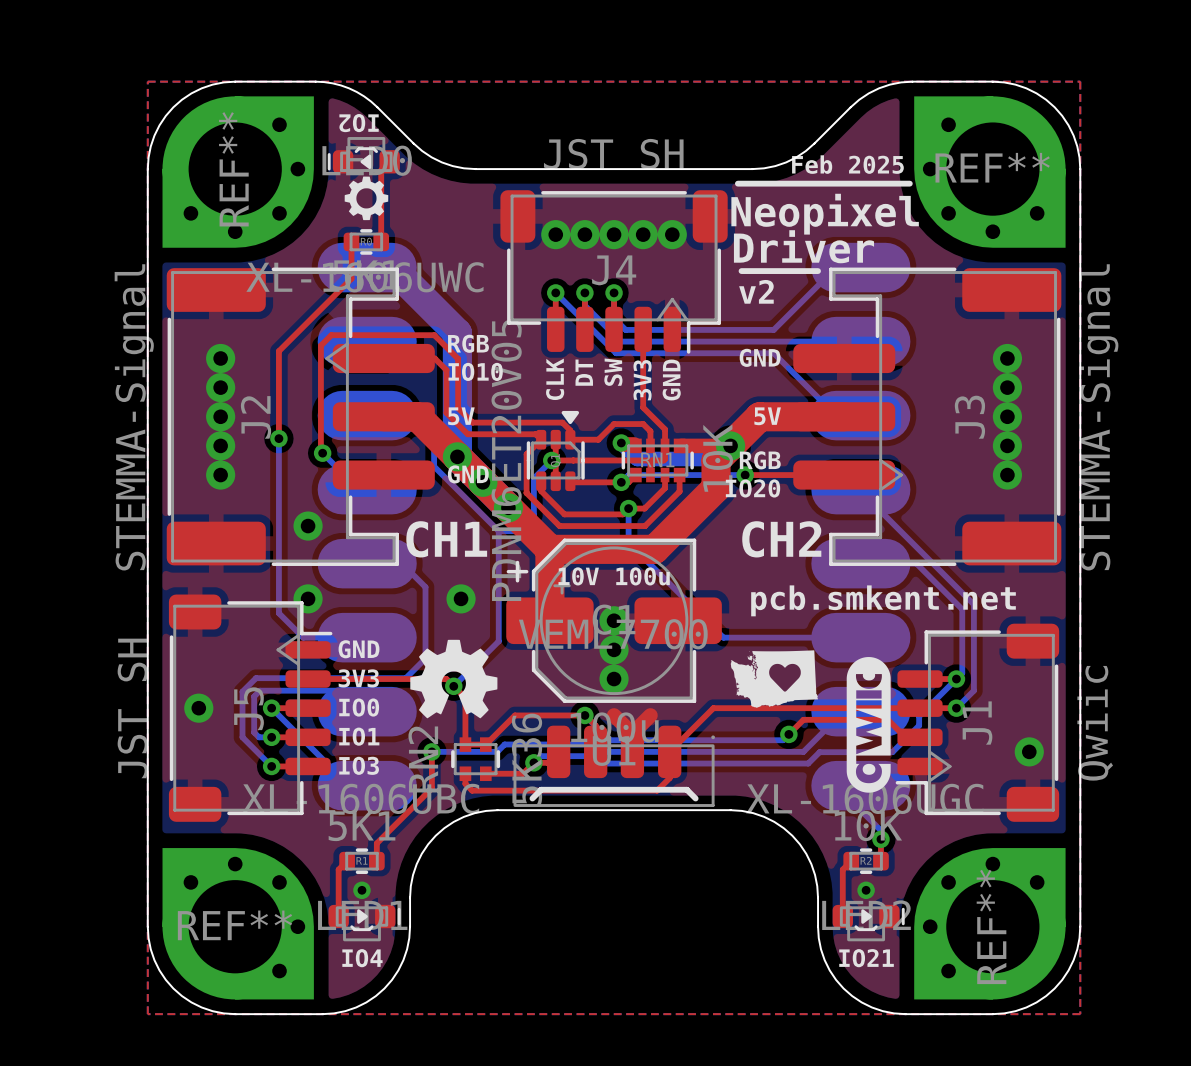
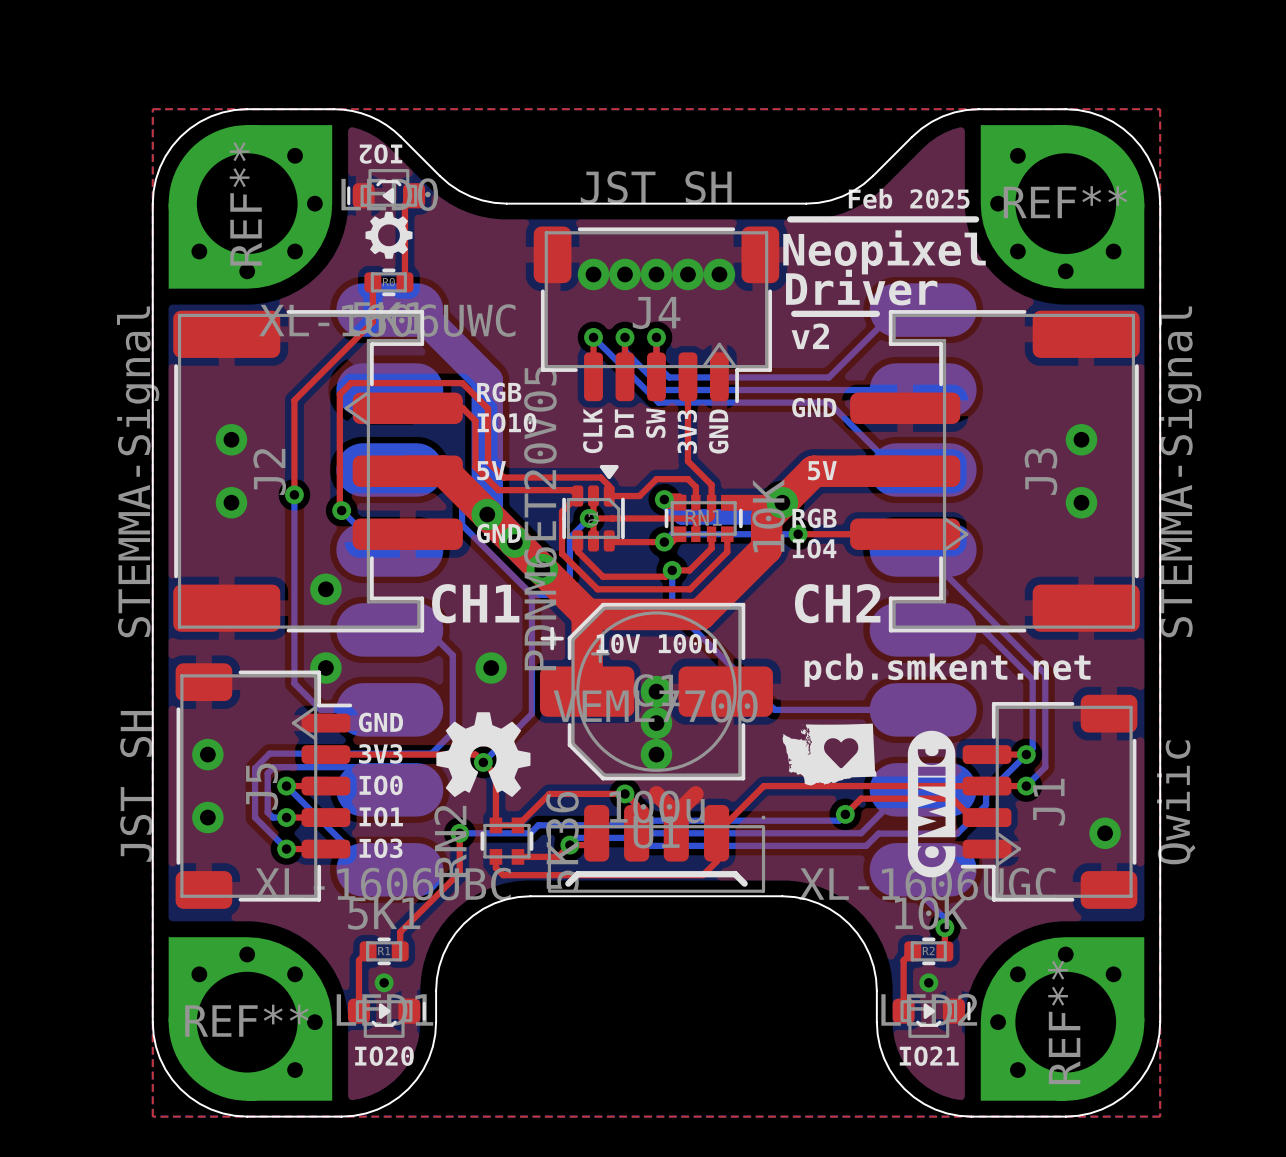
via: (220, 358) -> none
via: (1007, 358) -> none
via: (220, 416) -> none
via: (1007, 416) -> none
via: (220, 475) -> none
via: (1007, 475) -> none
text: IO20 (753, 488) -> IO4 (814, 548)
via: none -> (207, 754)
via: (198, 708) -> none
via: none -> (207, 817)
text: IO4 (362, 958) -> IO20 (384, 1056)

